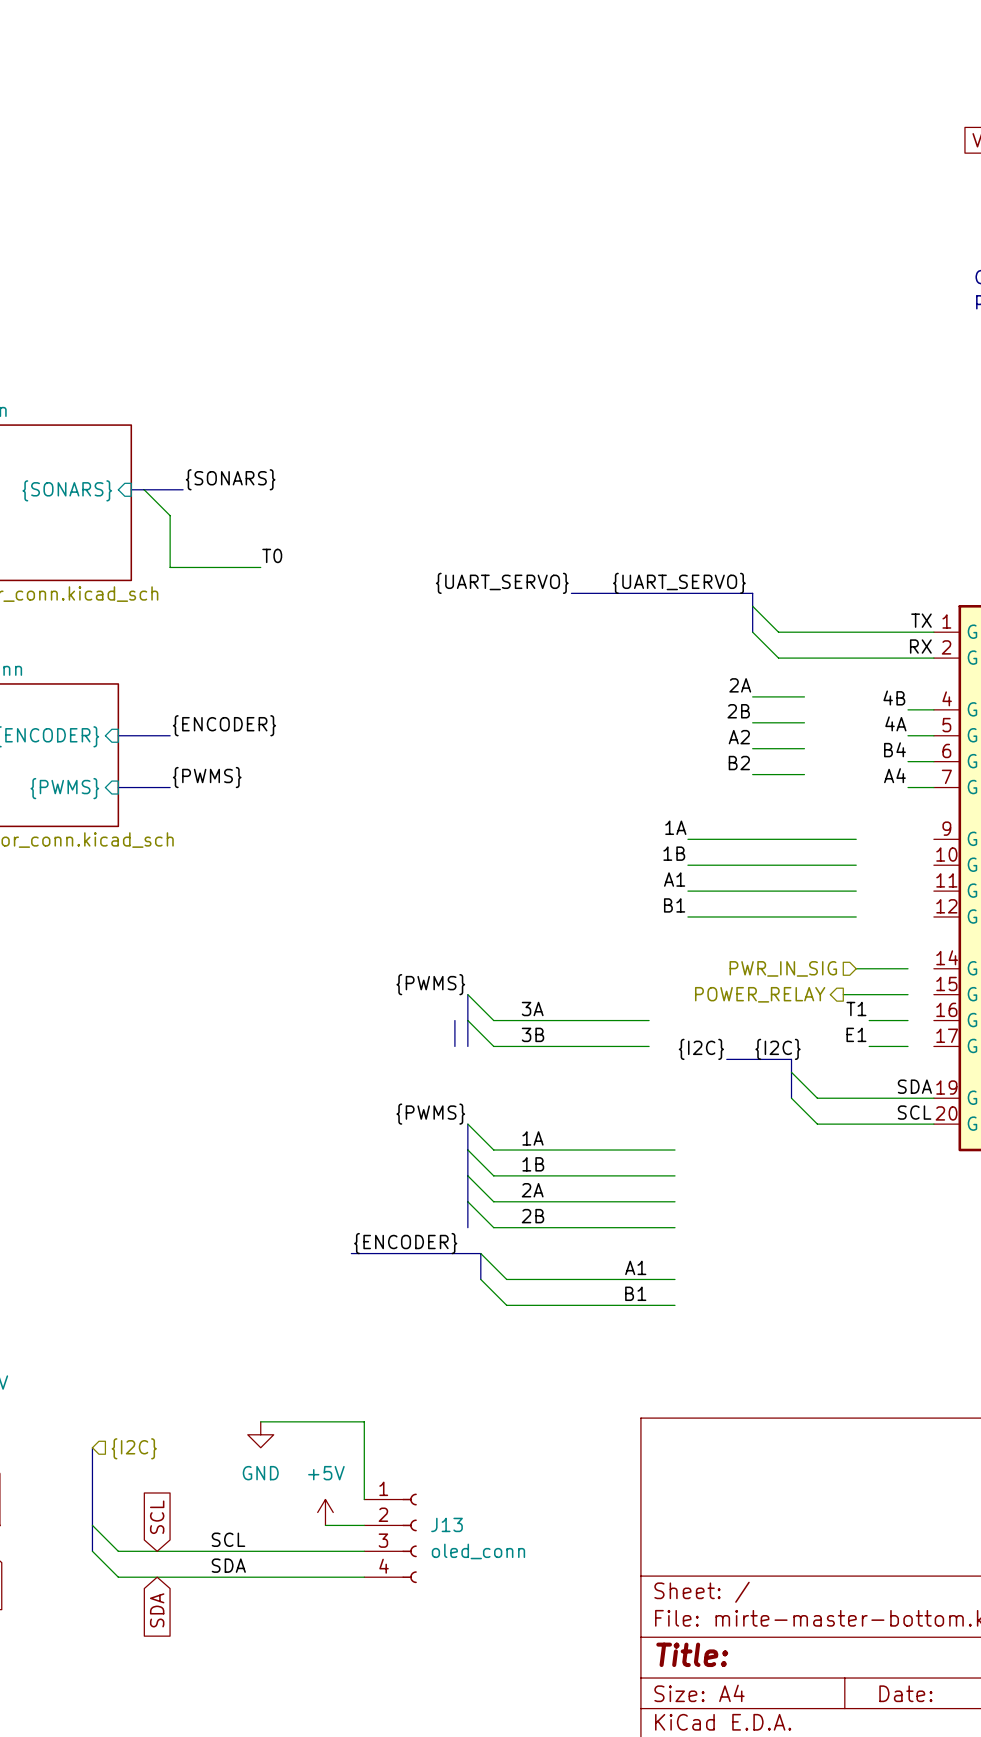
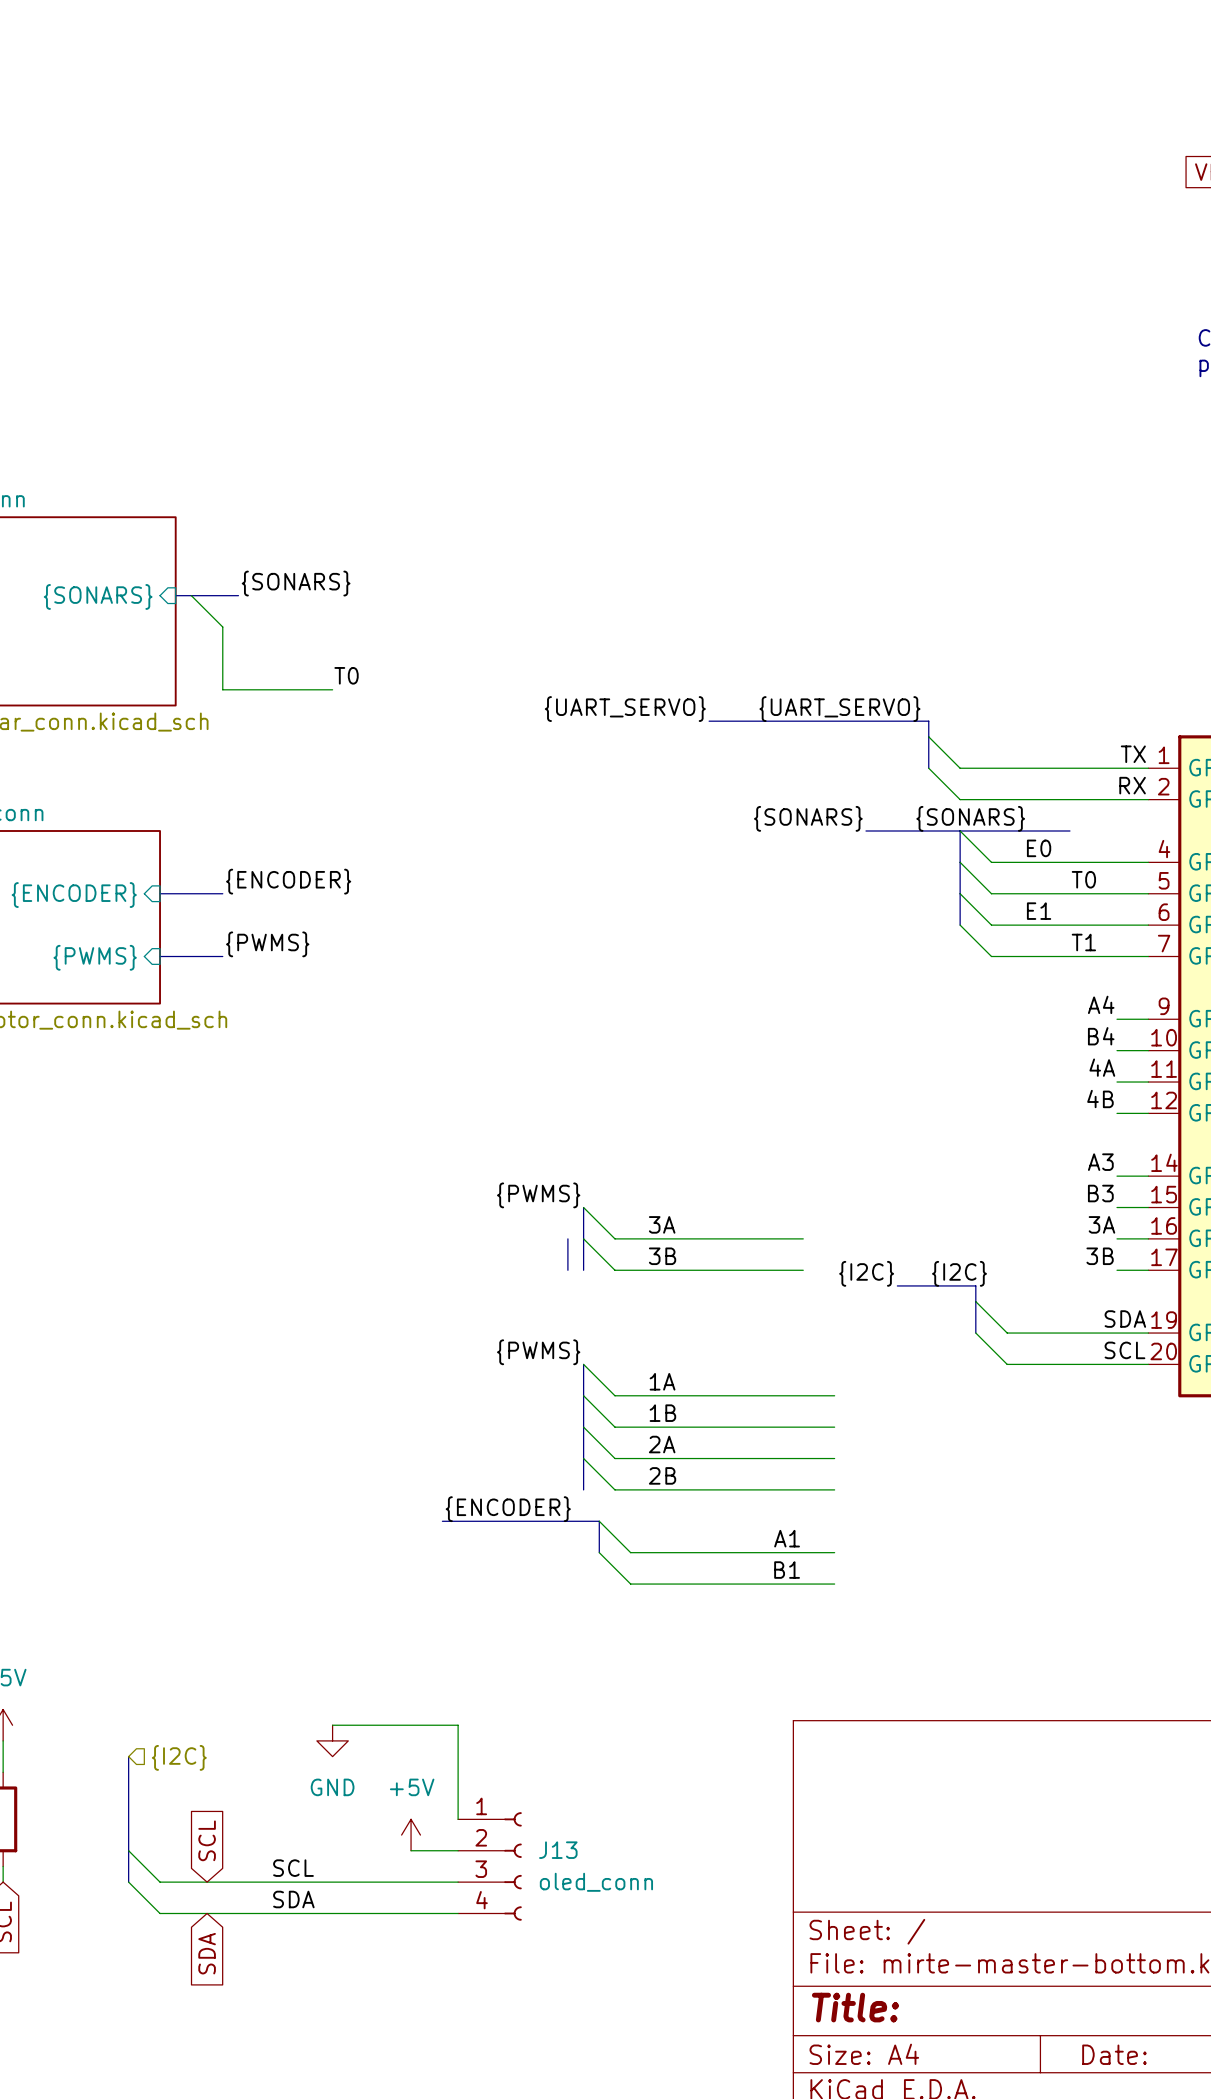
label: none -> {SONARS} (808, 818)
label: none -> {SONARS} (970, 818)
bus: none -> (866, 831) (1069, 831)
wire: none -> (960, 831) (991, 862) (1117, 862)
bus: none -> (960, 831) (960, 925)
label: 2A (740, 685) -> none
wire: (752, 696) (804, 696) -> none
label: none -> E0 (1039, 848)
label position: 4B (894, 698) -> 4B (1100, 1099)
wire: none -> (960, 862) (991, 893) (1117, 893)
label: 2B (738, 711) -> none
wire: (752, 722) (804, 722) -> none
label position: 4A (895, 723) -> 4A (1102, 1067)
label: none -> T0 (1083, 879)
wire: none -> (960, 893) (991, 925) (1117, 925)
label: A2 (739, 737) -> none
wire: (752, 748) (804, 748) -> none
label position: B4 (894, 749) -> B4 (1101, 1036)
label: none -> E1 (1039, 911)
wire: none -> (960, 925) (991, 956) (1117, 956)
label: B2 (739, 763) -> none
wire: (752, 774) (804, 774) -> none
label position: A4 (894, 775) -> A4 (1101, 1004)
label: 1A (675, 827) -> none
wire: (687, 839) (856, 839) -> none
wire: none -> (1117, 1019) (1148, 1019)
label: 1B (674, 853) -> none
wire: (687, 865) (856, 865) -> none
wire: none -> (1117, 1050) (1148, 1050)
label: A1 (674, 879) -> none
wire: (687, 891) (856, 891) -> none
wire: none -> (1117, 1082) (1148, 1082)
label: B1 (674, 905) -> none
wire: (687, 916) (856, 916) -> none
wire: none -> (1117, 1113) (1148, 1113)
label: none -> A3 (1100, 1162)
hierarchical label: PWR_IN_SIG (783, 968) -> none
wire: (856, 968) (908, 968) -> (1148, 1176) (1117, 1176)
label: none -> B3 (1100, 1193)
hierarchical label: POWER_RELAY (760, 994) -> none
wire: (843, 994) (908, 994) -> (1148, 1207) (1117, 1207)
label position: T1 (856, 1009) -> T1 (1083, 942)
label: none -> 3A (1101, 1224)
wire: (869, 1020) (908, 1020) -> (1148, 1238) (1117, 1238)
label: E1 (856, 1034) -> none
label: none -> 3B (1100, 1256)
wire: (869, 1046) (908, 1046) -> (1148, 1270) (1117, 1270)

